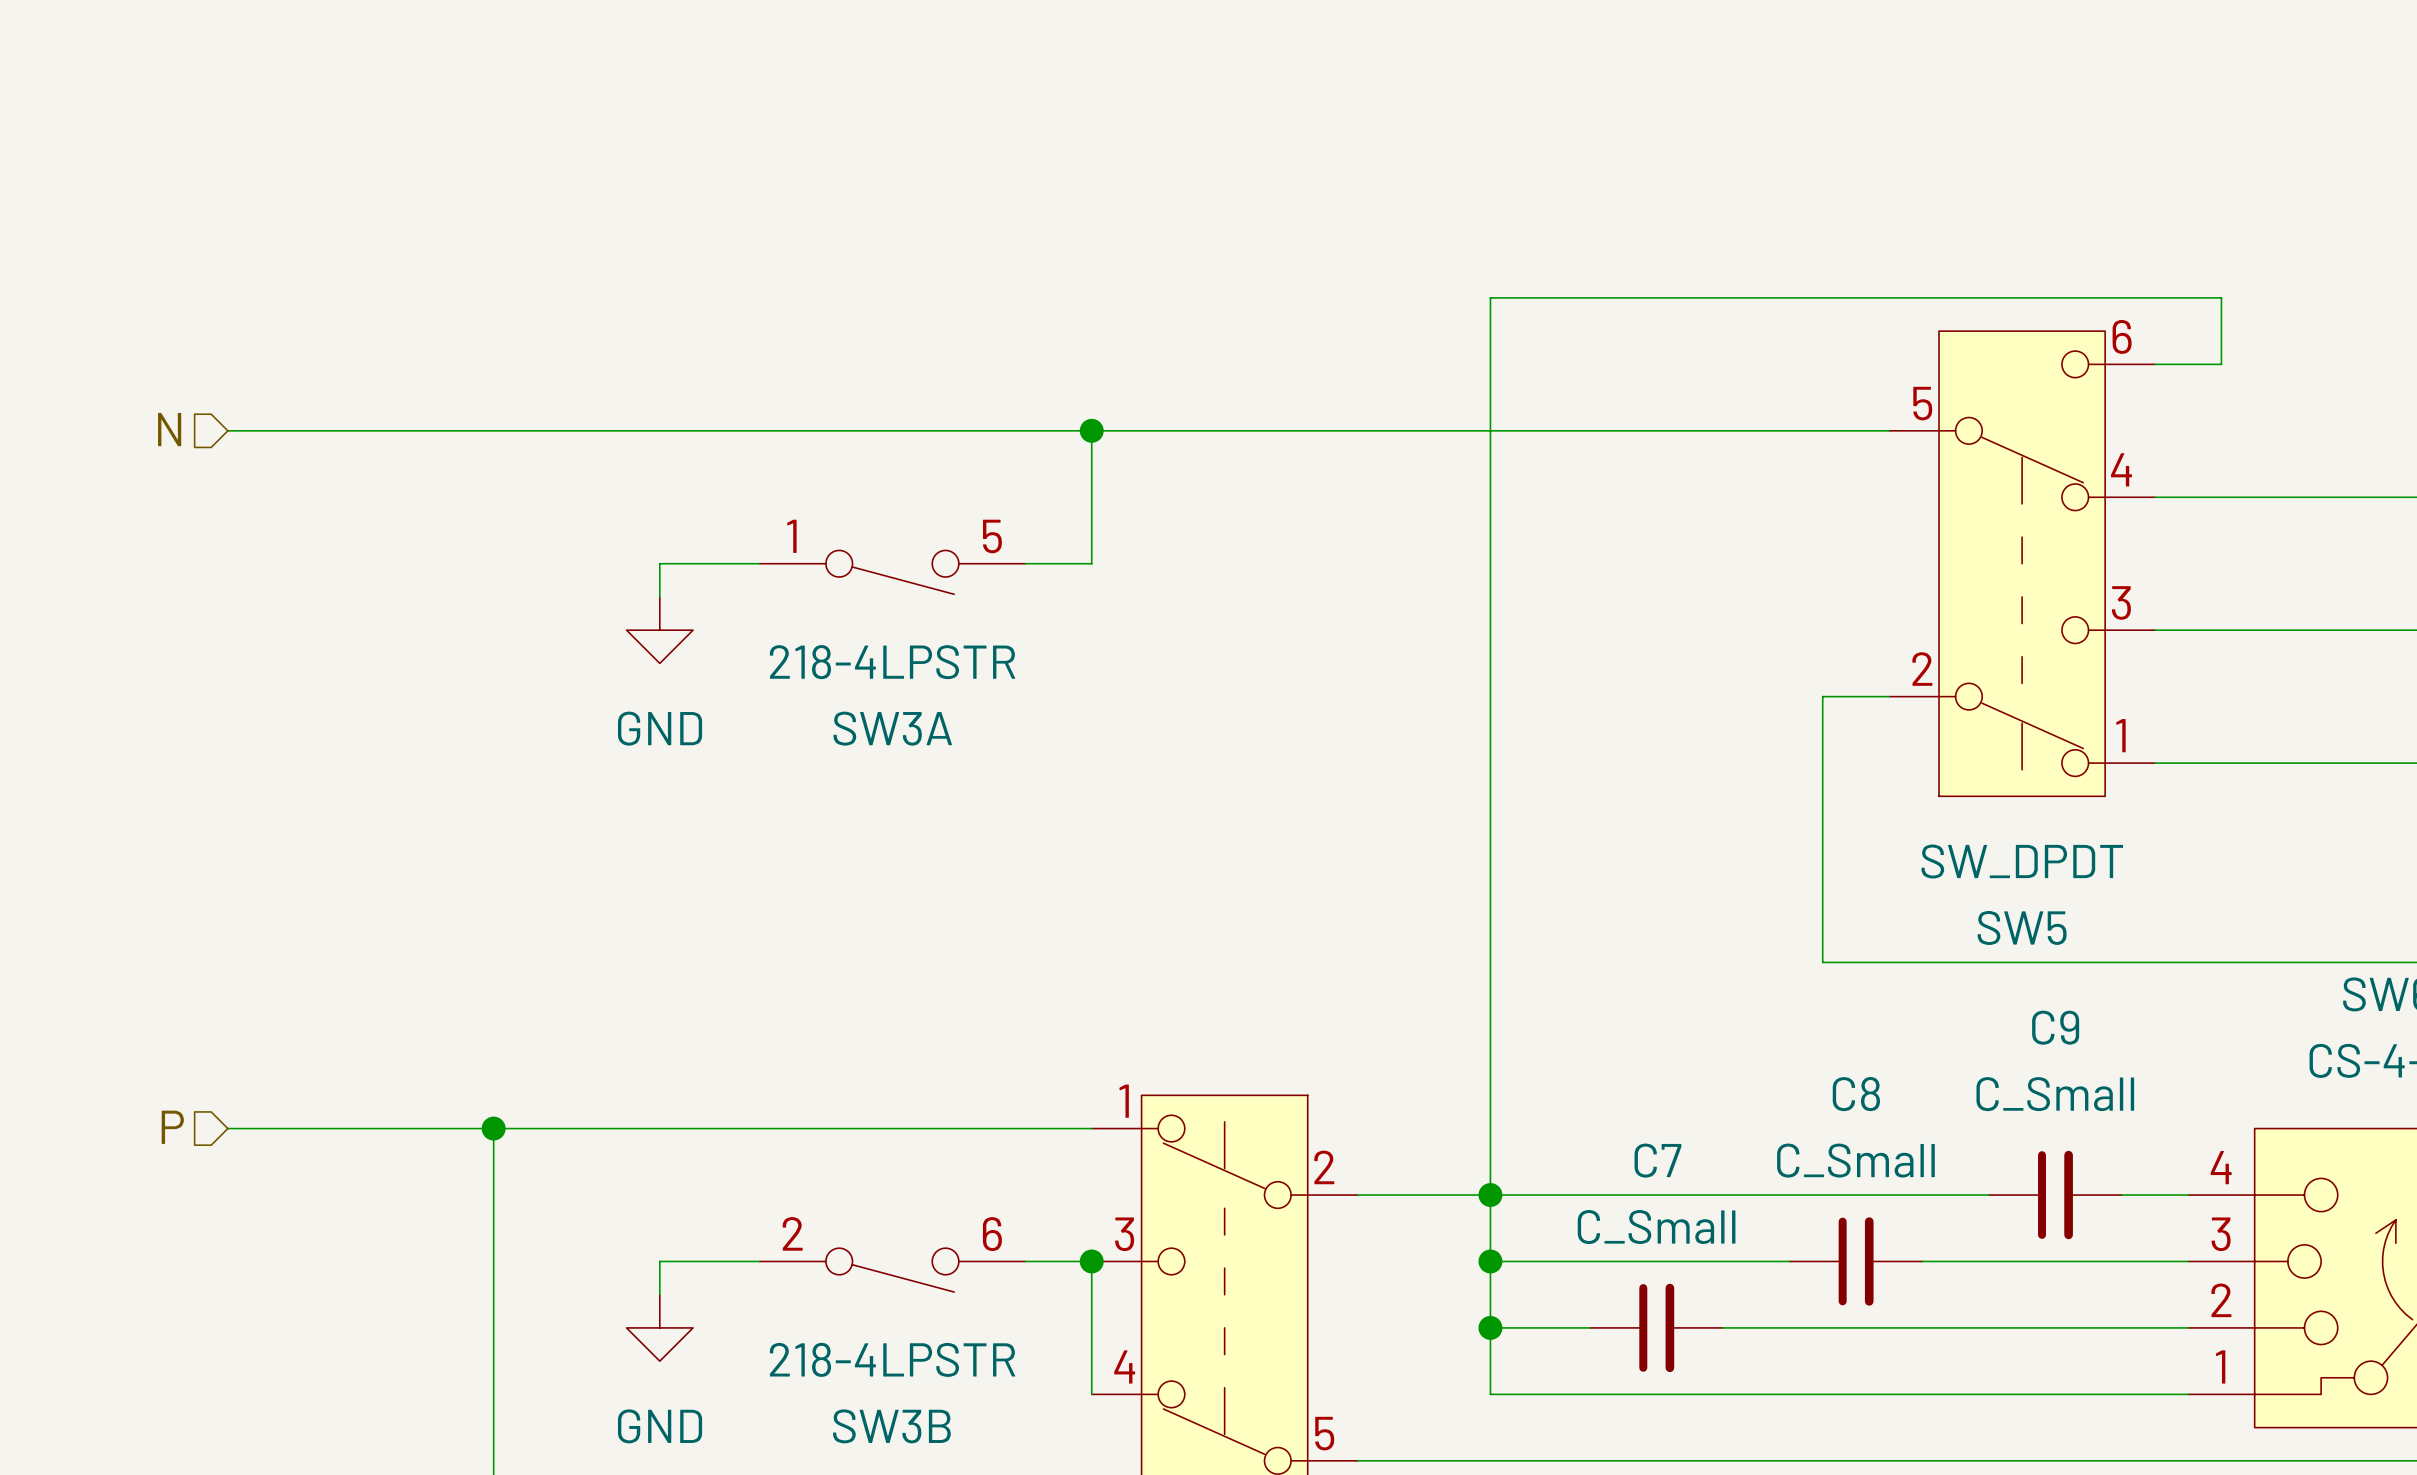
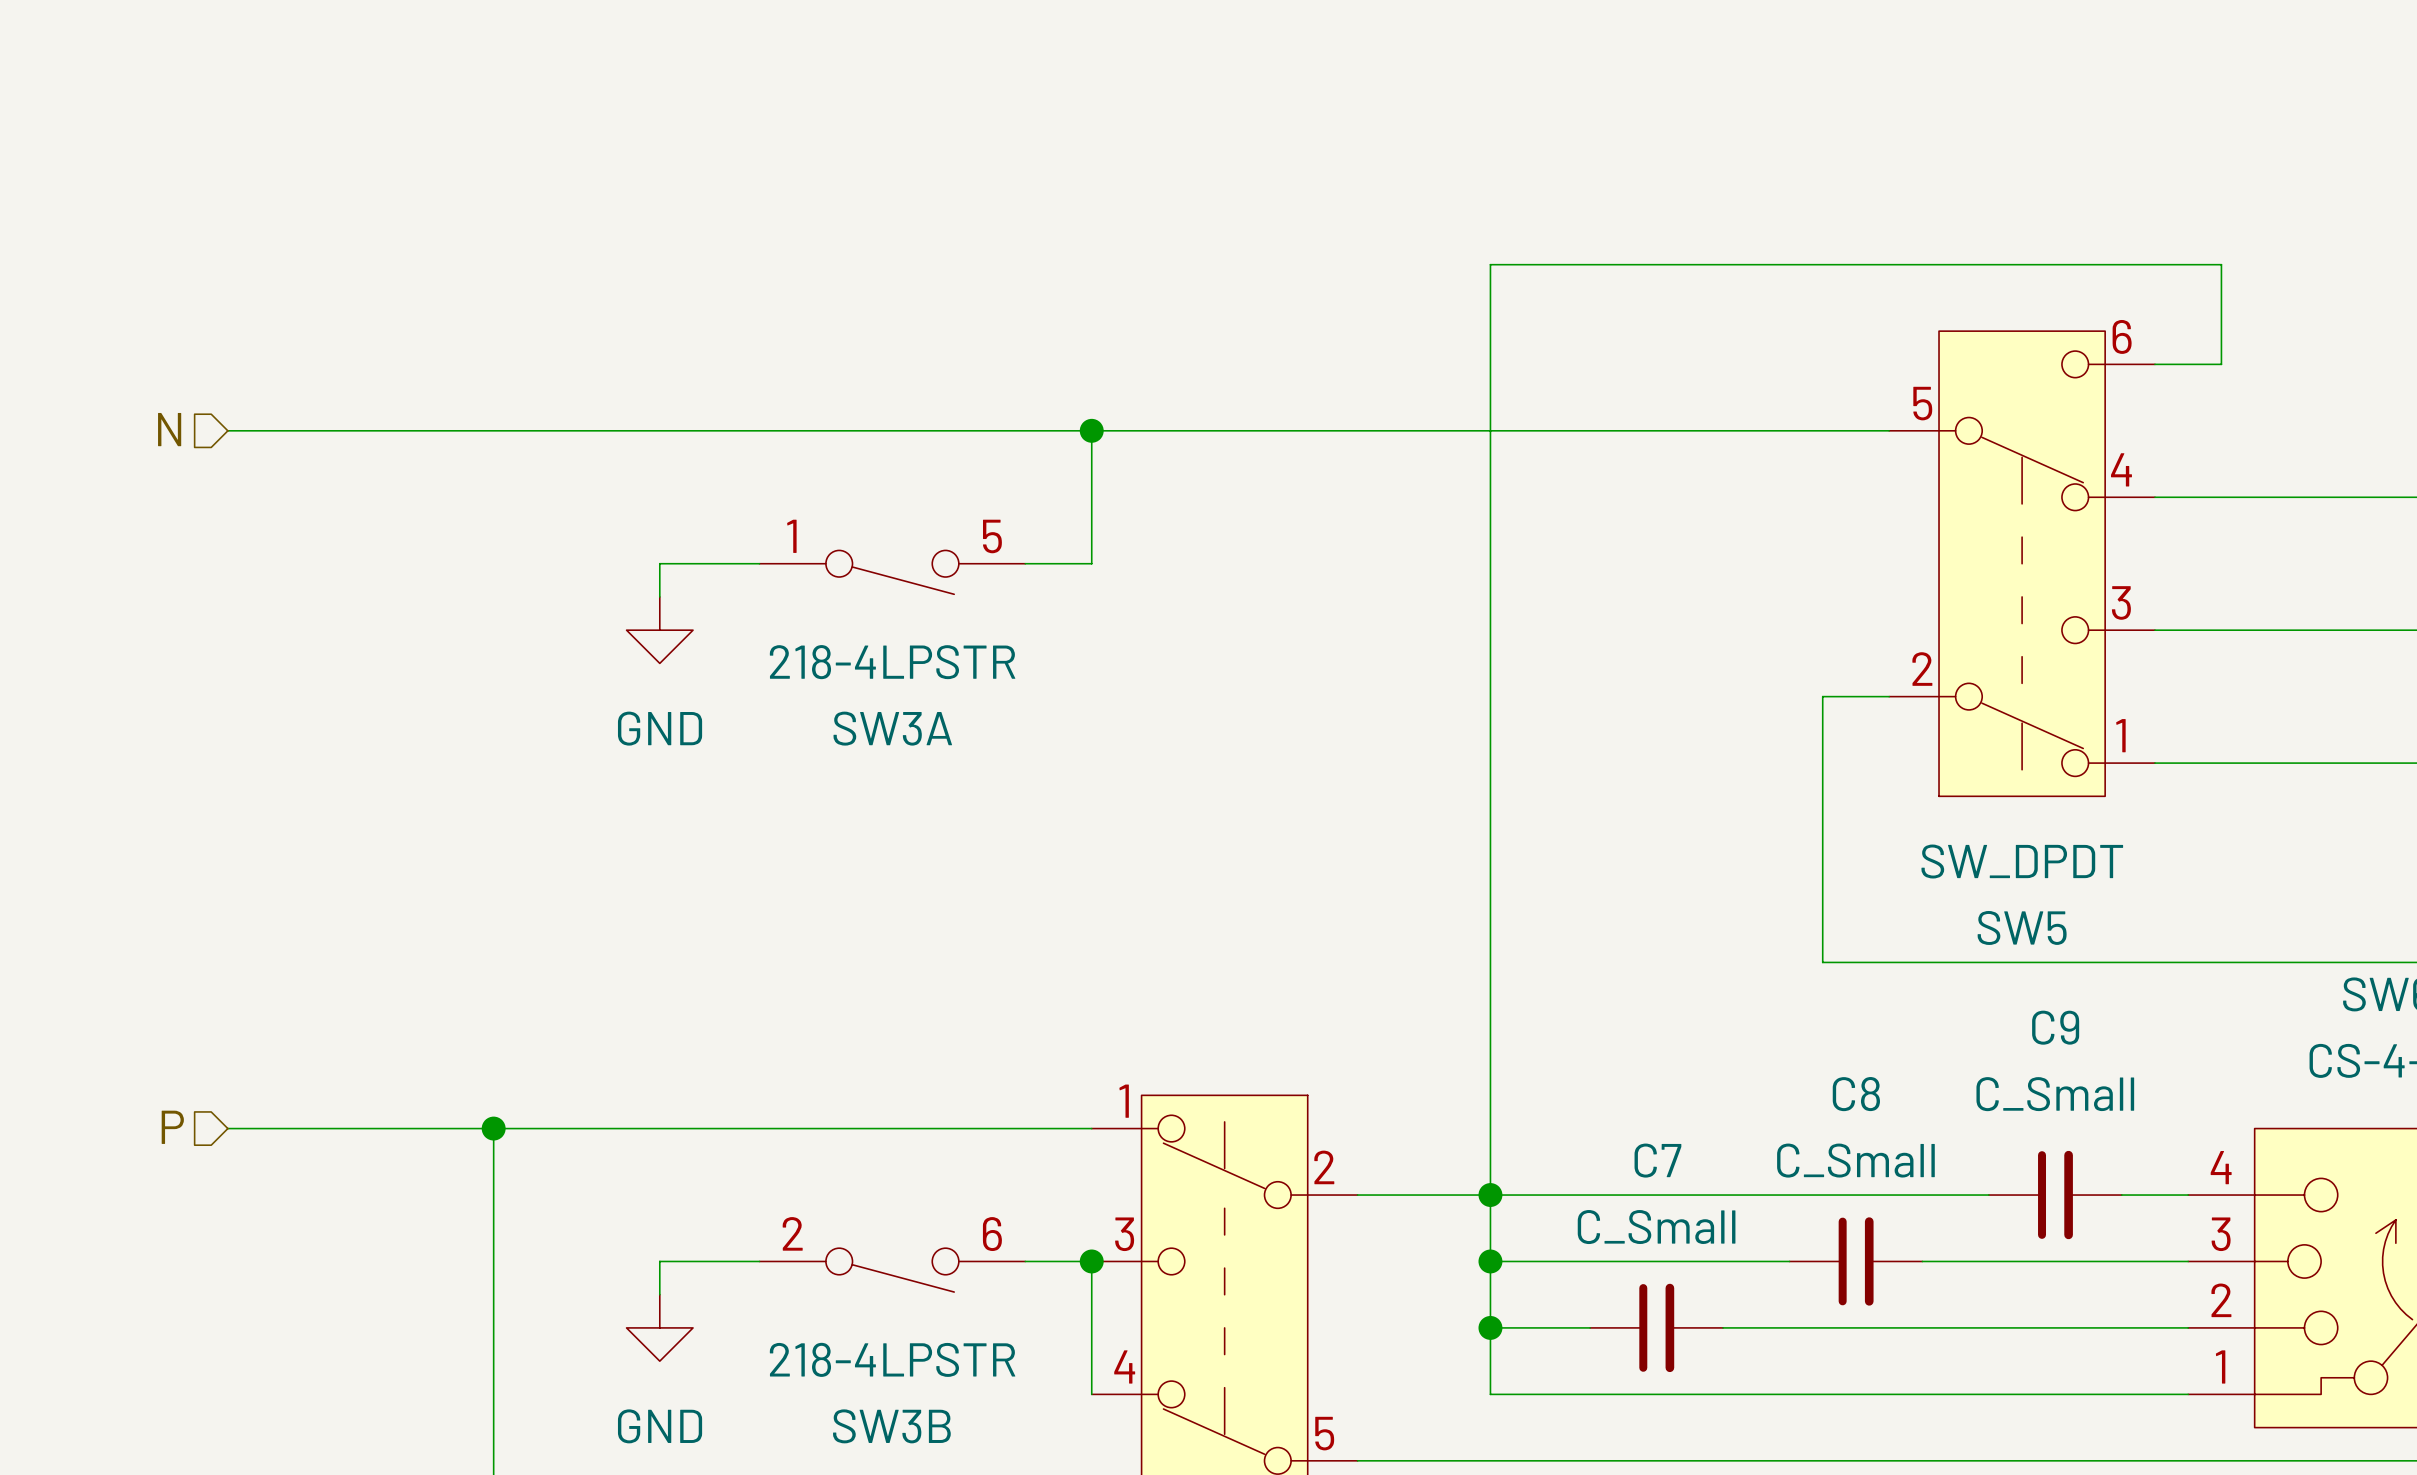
wire: (1490, 297) (2221, 297) -> (1490, 297) (1490, 264) (2221, 264) (2221, 297)

